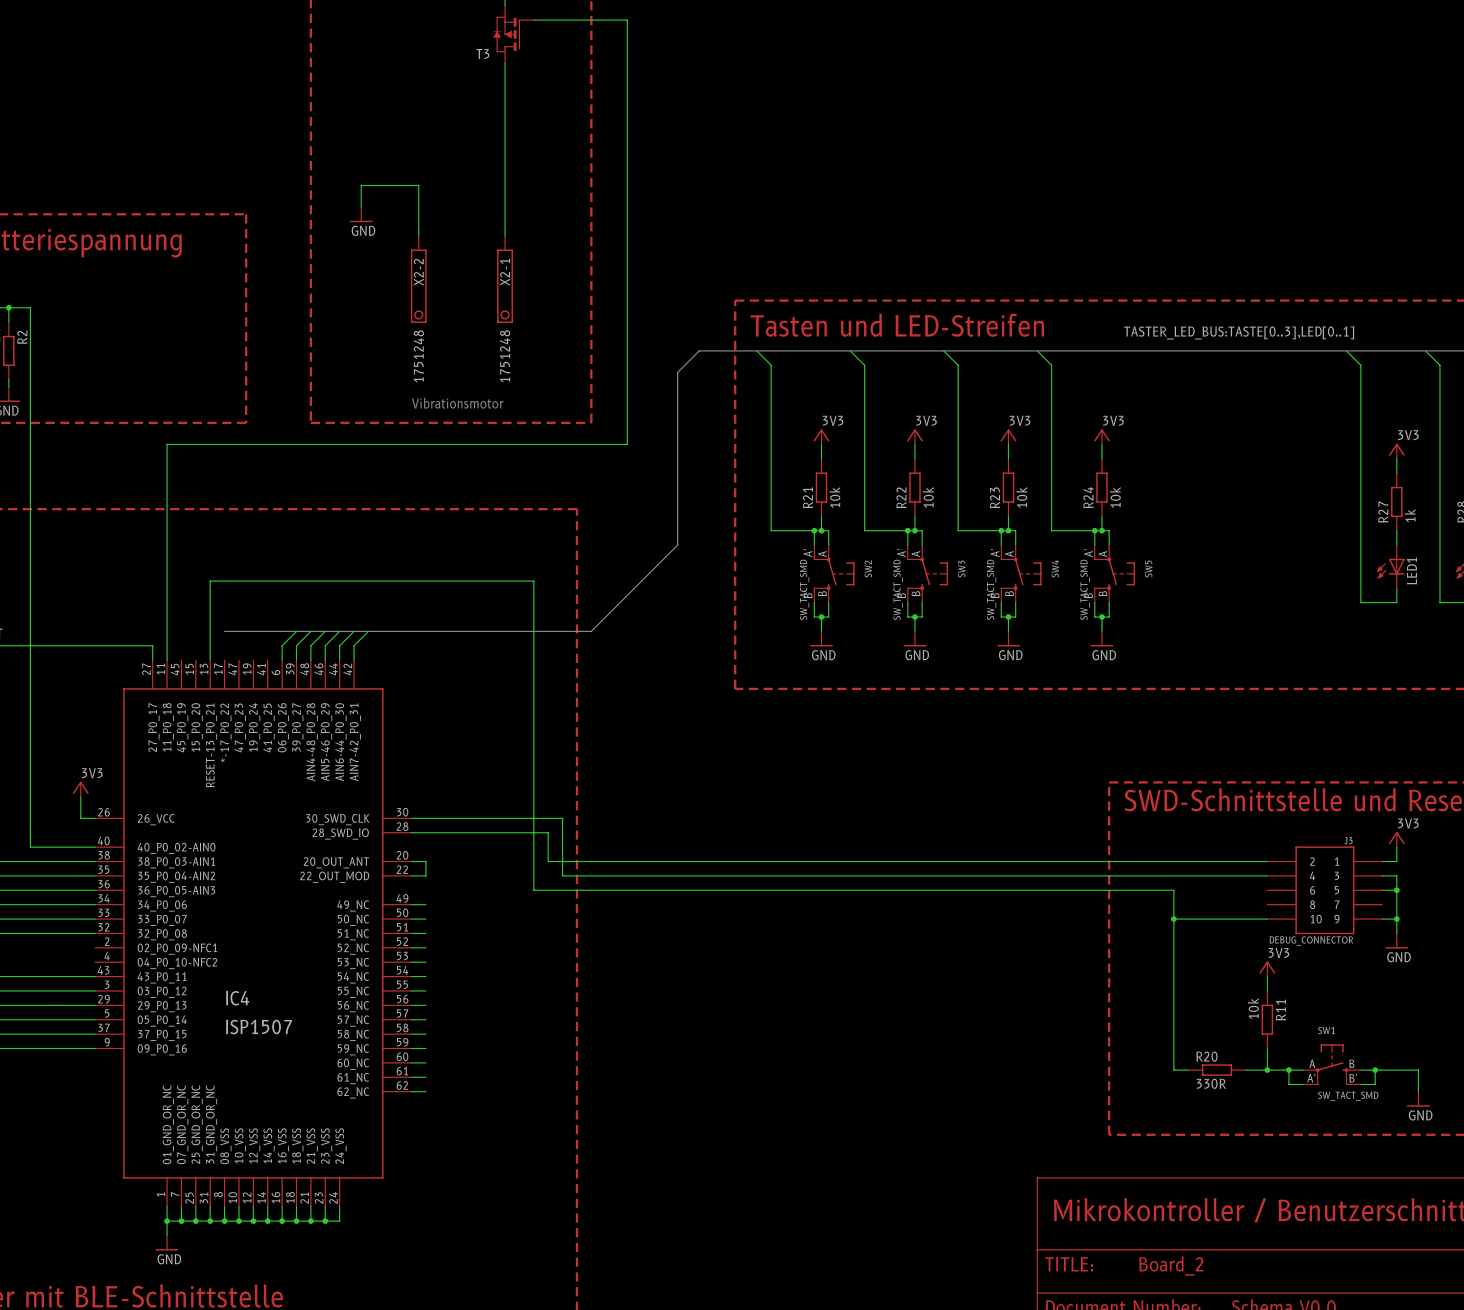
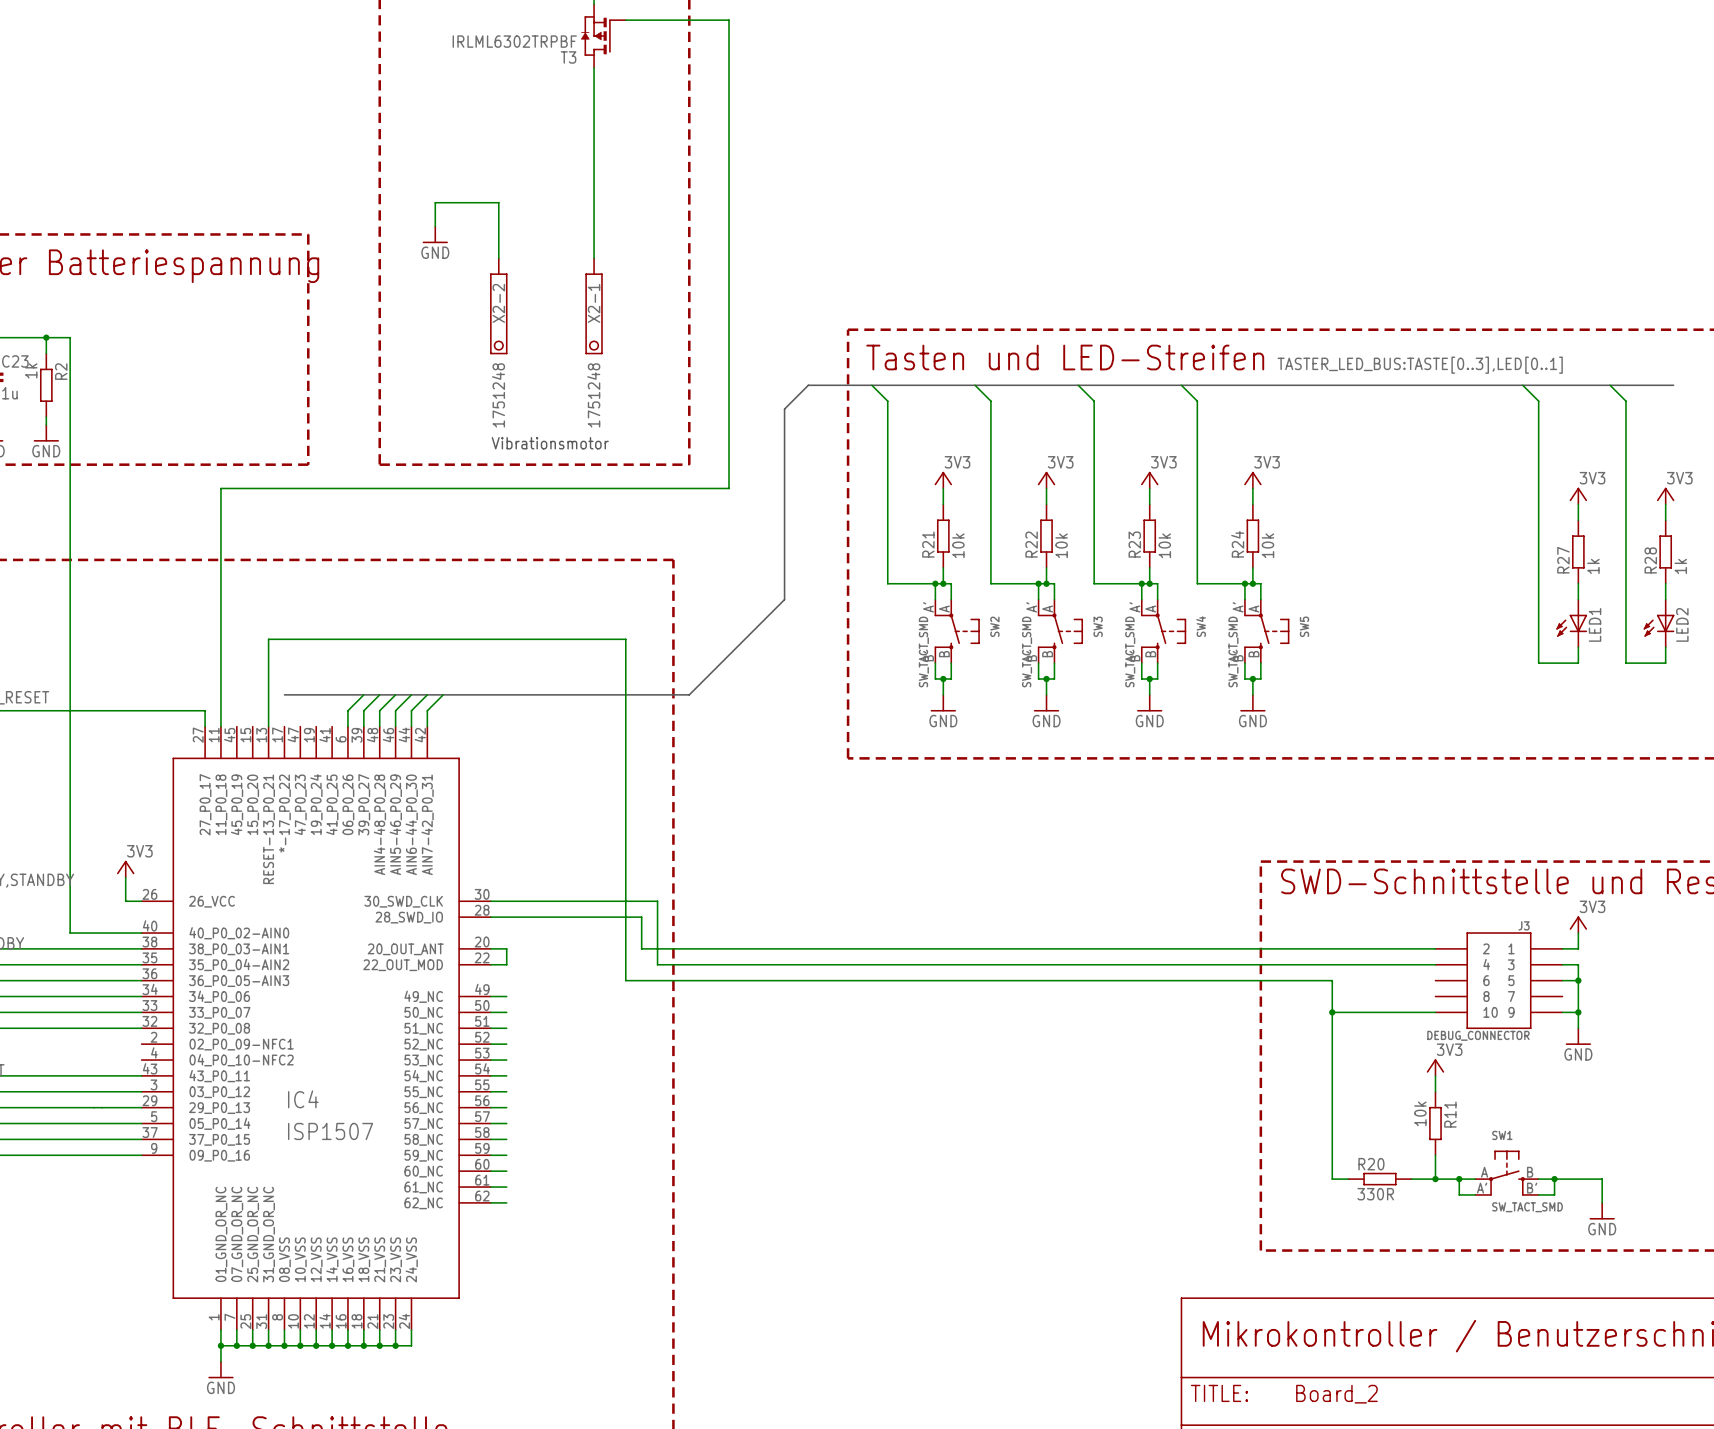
T3 value: none -> IRLML6302TRPBF (514, 41)

